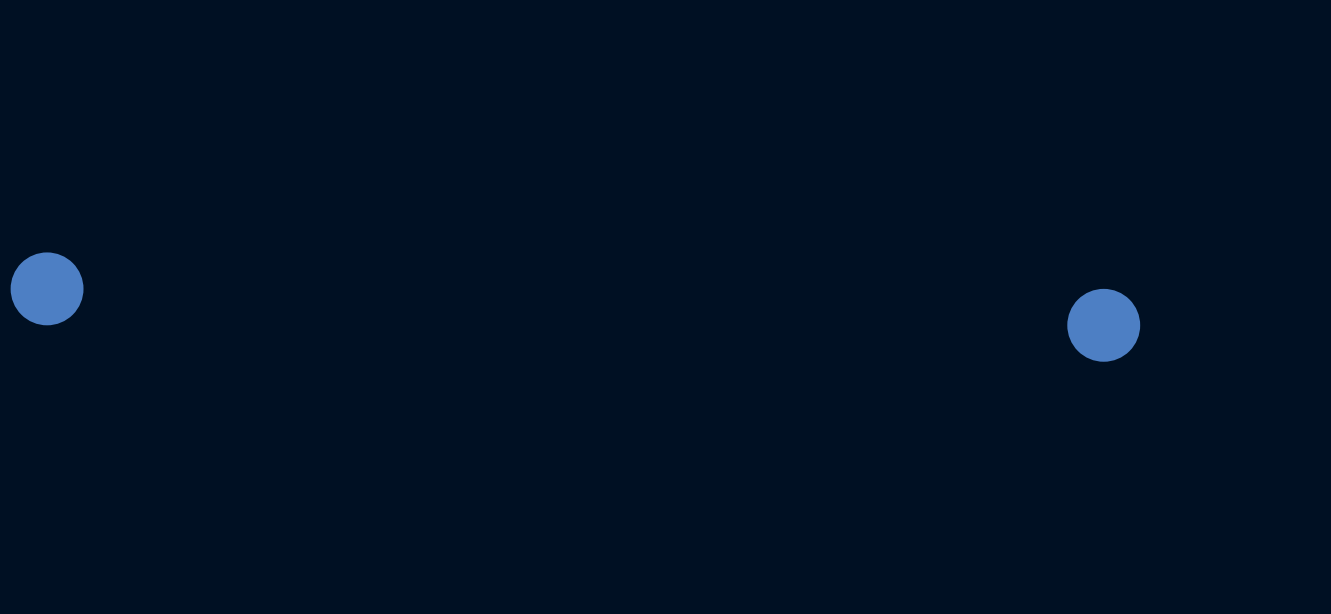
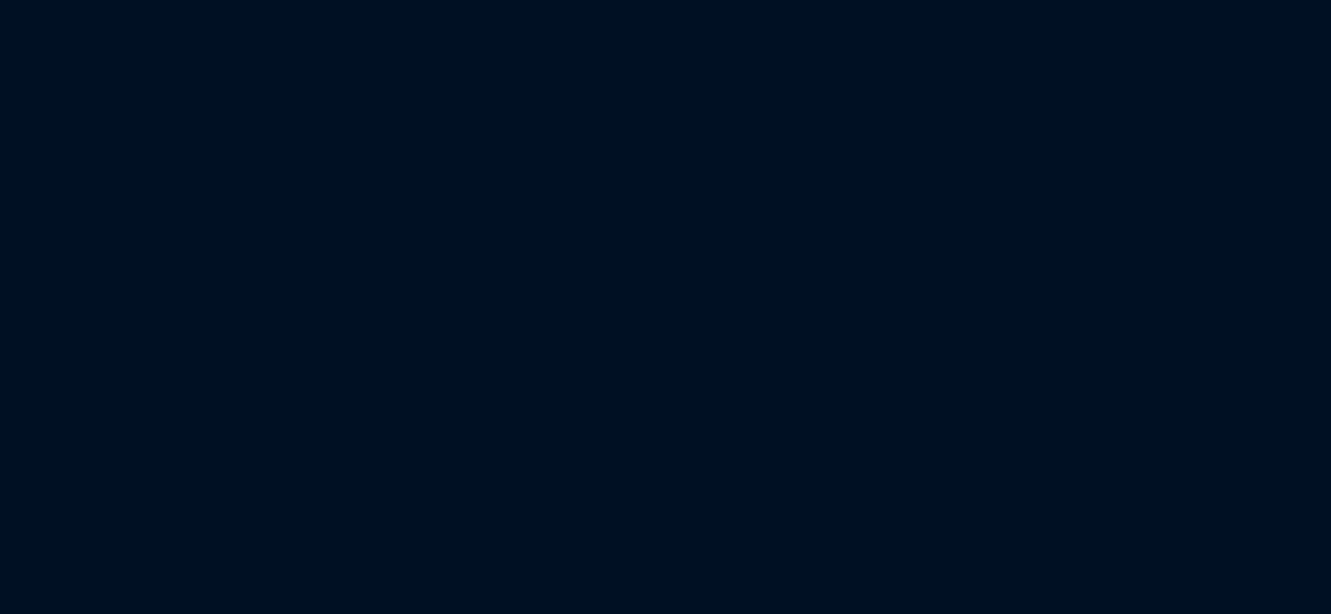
part: (47, 288) -> none
part: (1103, 325) -> none

